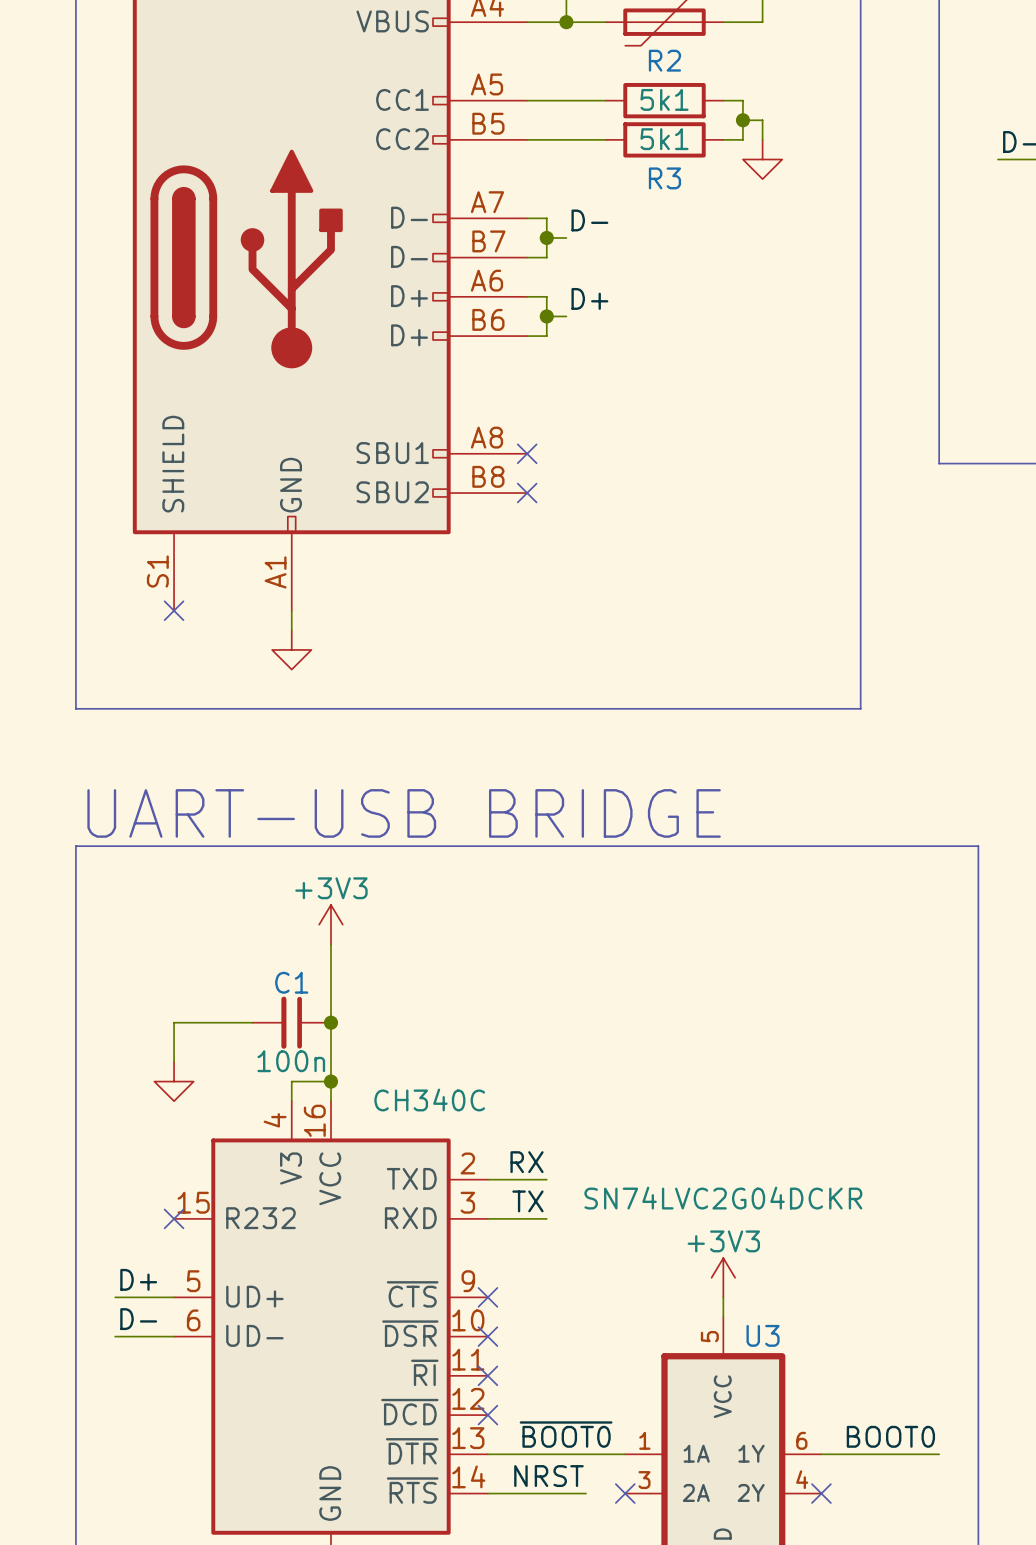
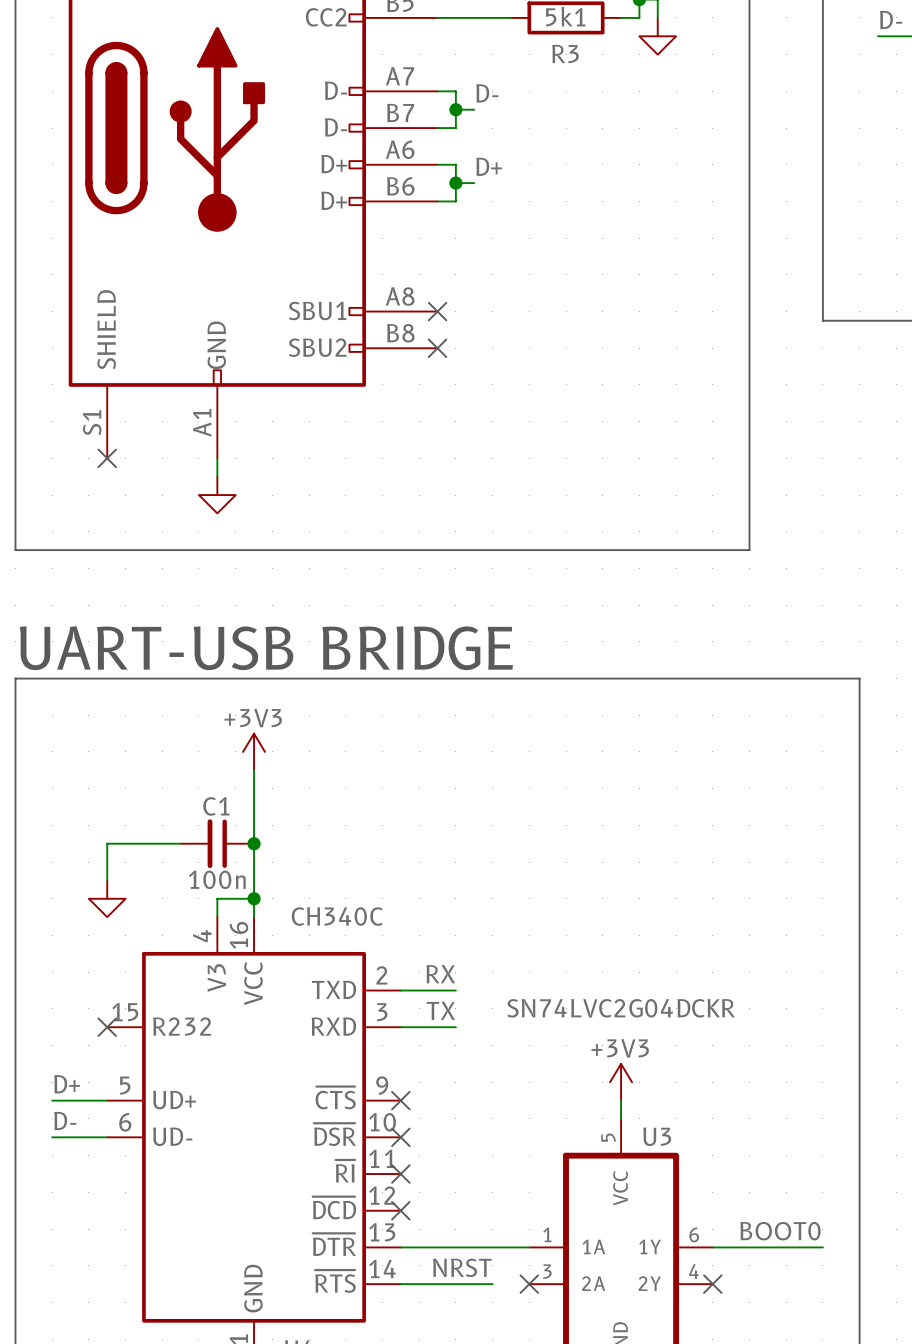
label: ~{BOOT0} (566, 1434) -> none

